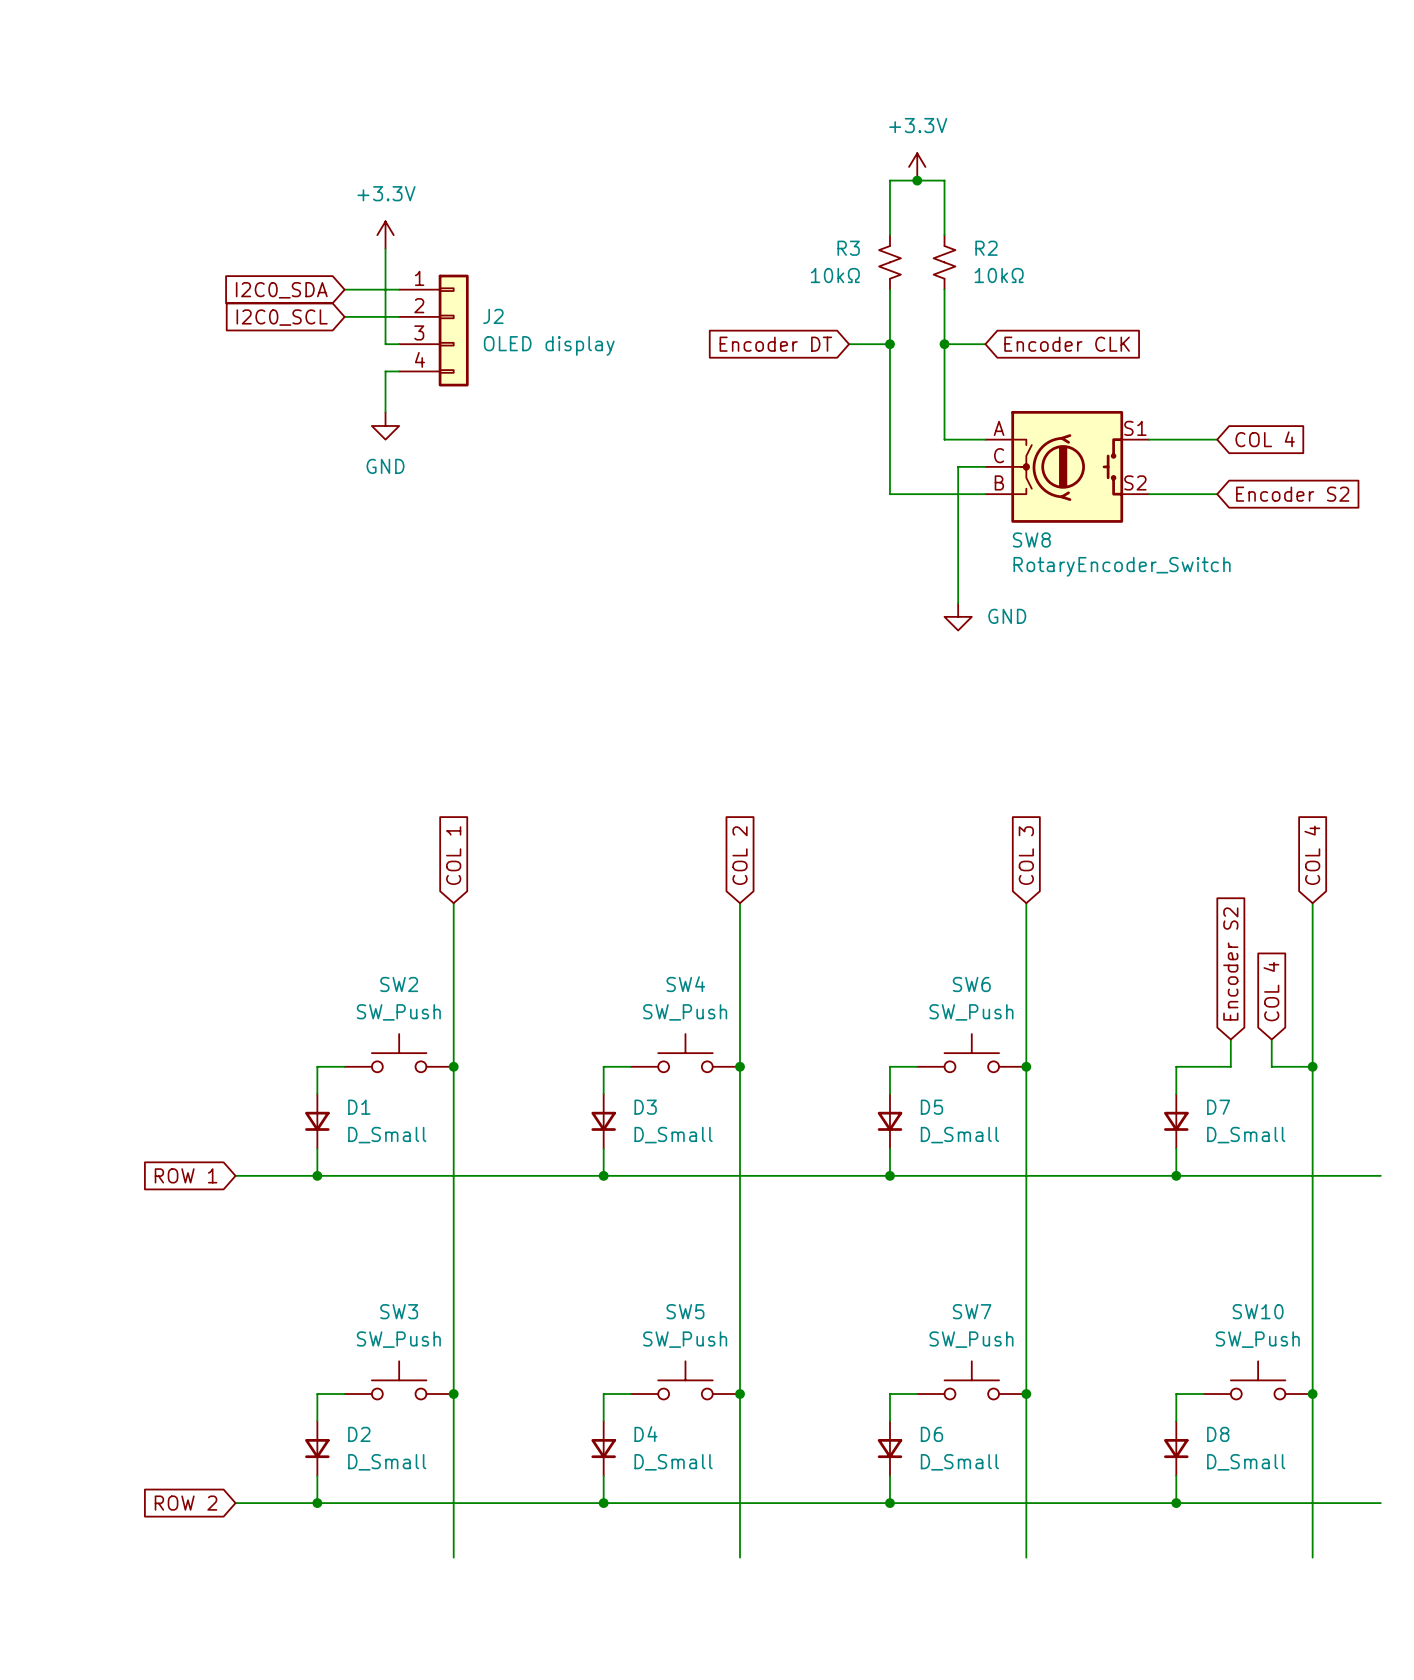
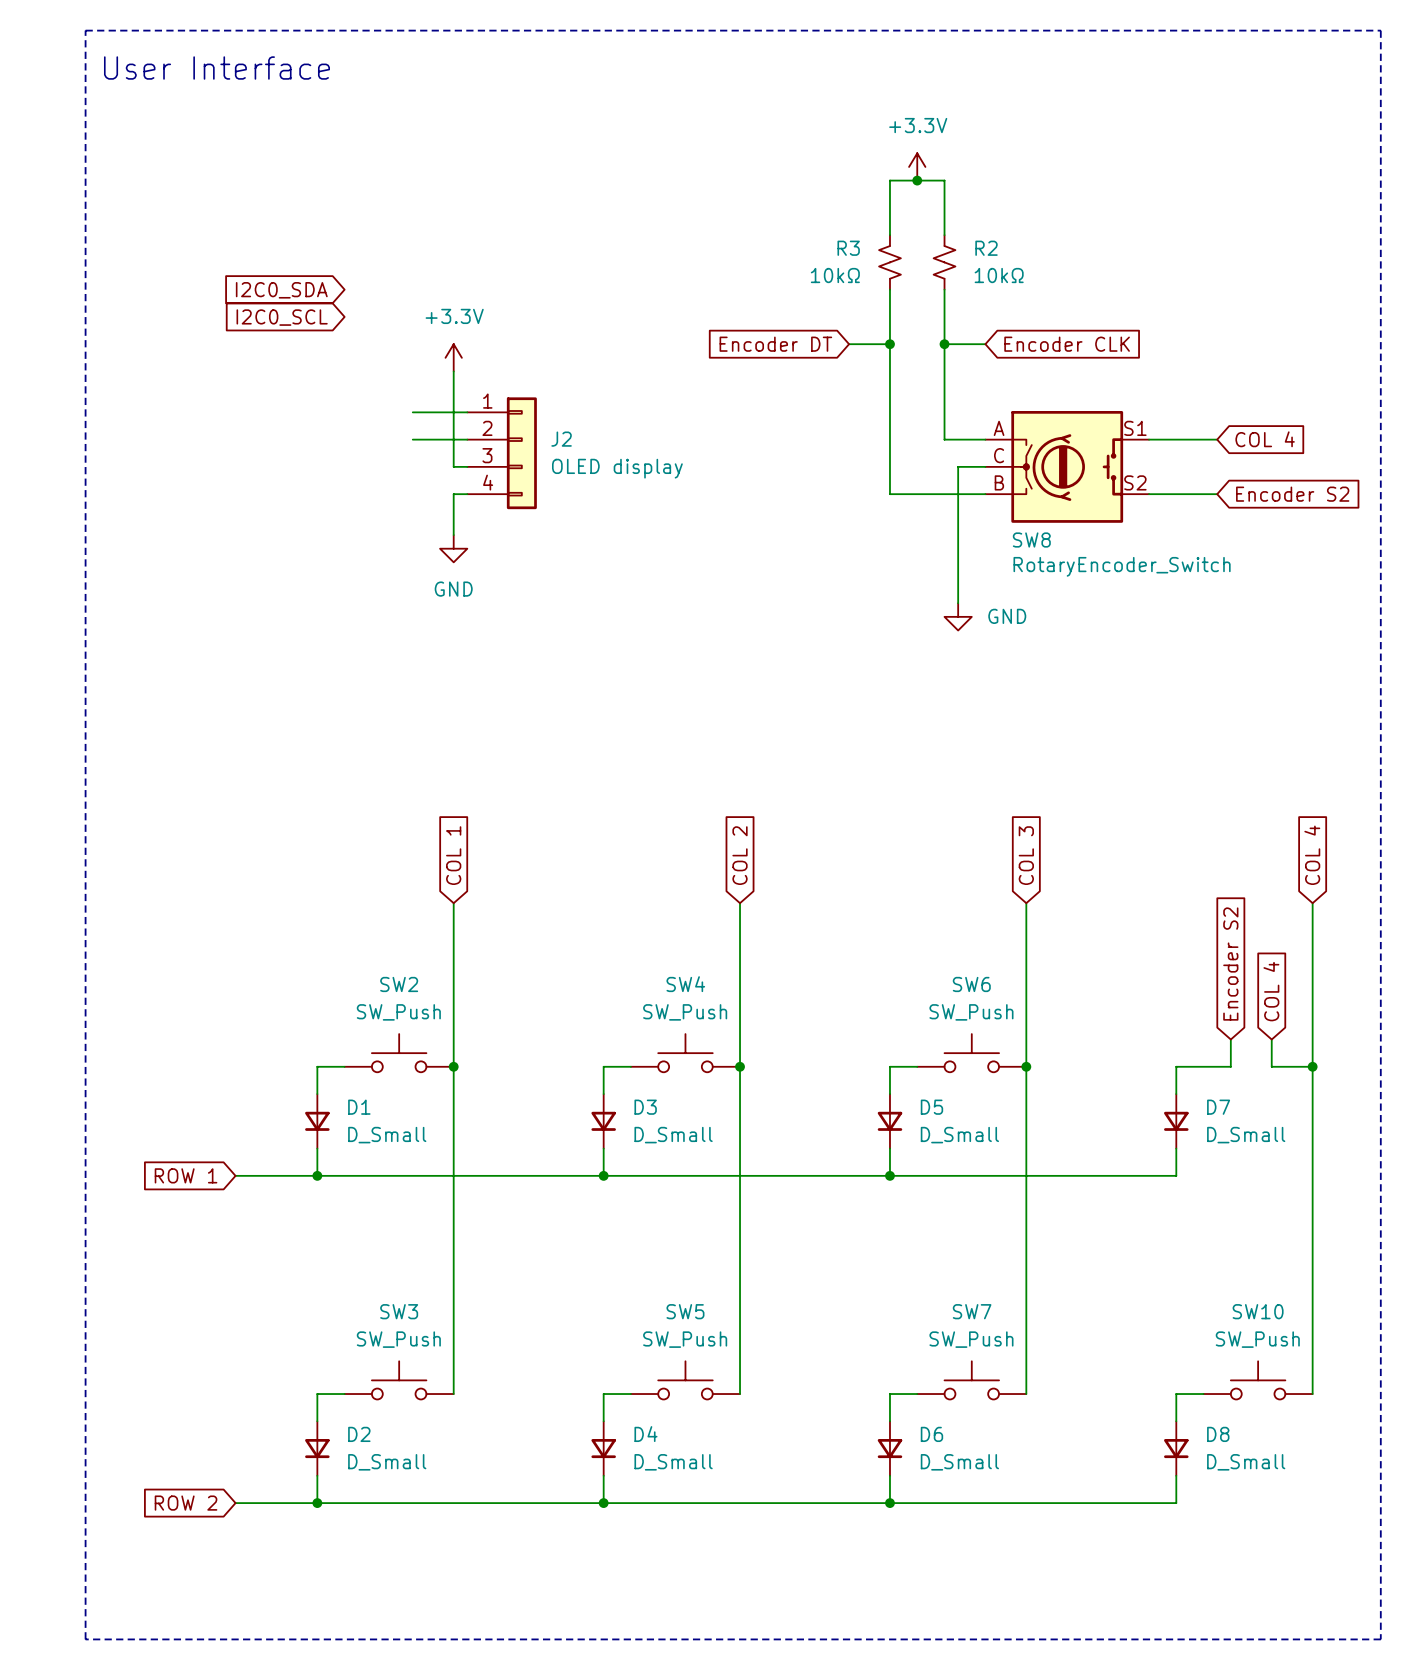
line: none -> (85, 30) (1380, 30) (1380, 1639) (85, 1639) (85, 30)
text: none -> User Interface (216, 68)
power symbol position: +3.3V (385, 235) -> +3.3V (453, 357)
wire: (385, 248) (385, 344) (399, 344) -> (453, 371) (453, 466) (467, 466)
wire: (344, 289) (399, 289) -> (412, 412) (467, 412)
wire: (344, 316) (399, 316) -> (412, 439) (467, 439)
J2 position: (433, 330) -> (502, 453)
wire: (399, 371) (385, 371) (385, 412) -> (467, 494) (453, 494) (453, 535)
power symbol position: GND (385, 425) -> GND (453, 548)
wire: (1176, 1175) (1380, 1175) -> none
junction: (1176, 1175) -> none
wire: (453, 1394) (453, 1557) -> none
junction: (453, 1394) -> none
wire: (740, 1394) (740, 1557) -> none
junction: (740, 1394) -> none
wire: (1026, 1394) (1026, 1557) -> none
junction: (1026, 1394) -> none
wire: (1312, 1394) (1312, 1557) -> none
junction: (1312, 1394) -> none
wire: (1176, 1503) (1380, 1503) -> none
junction: (1176, 1503) -> none

